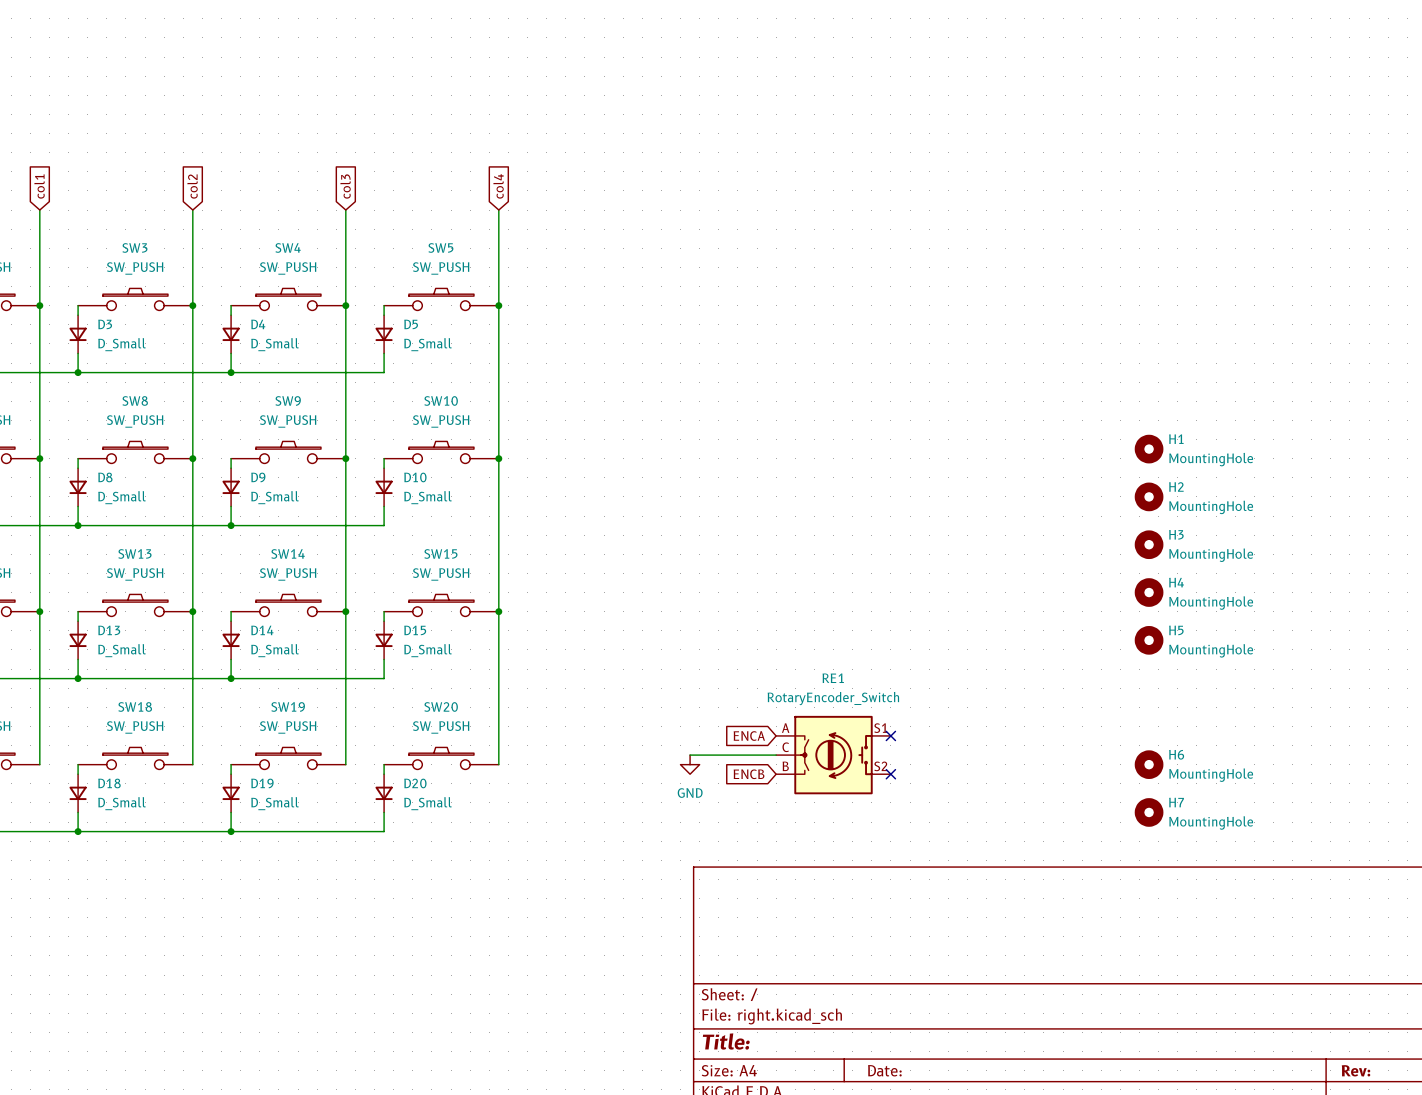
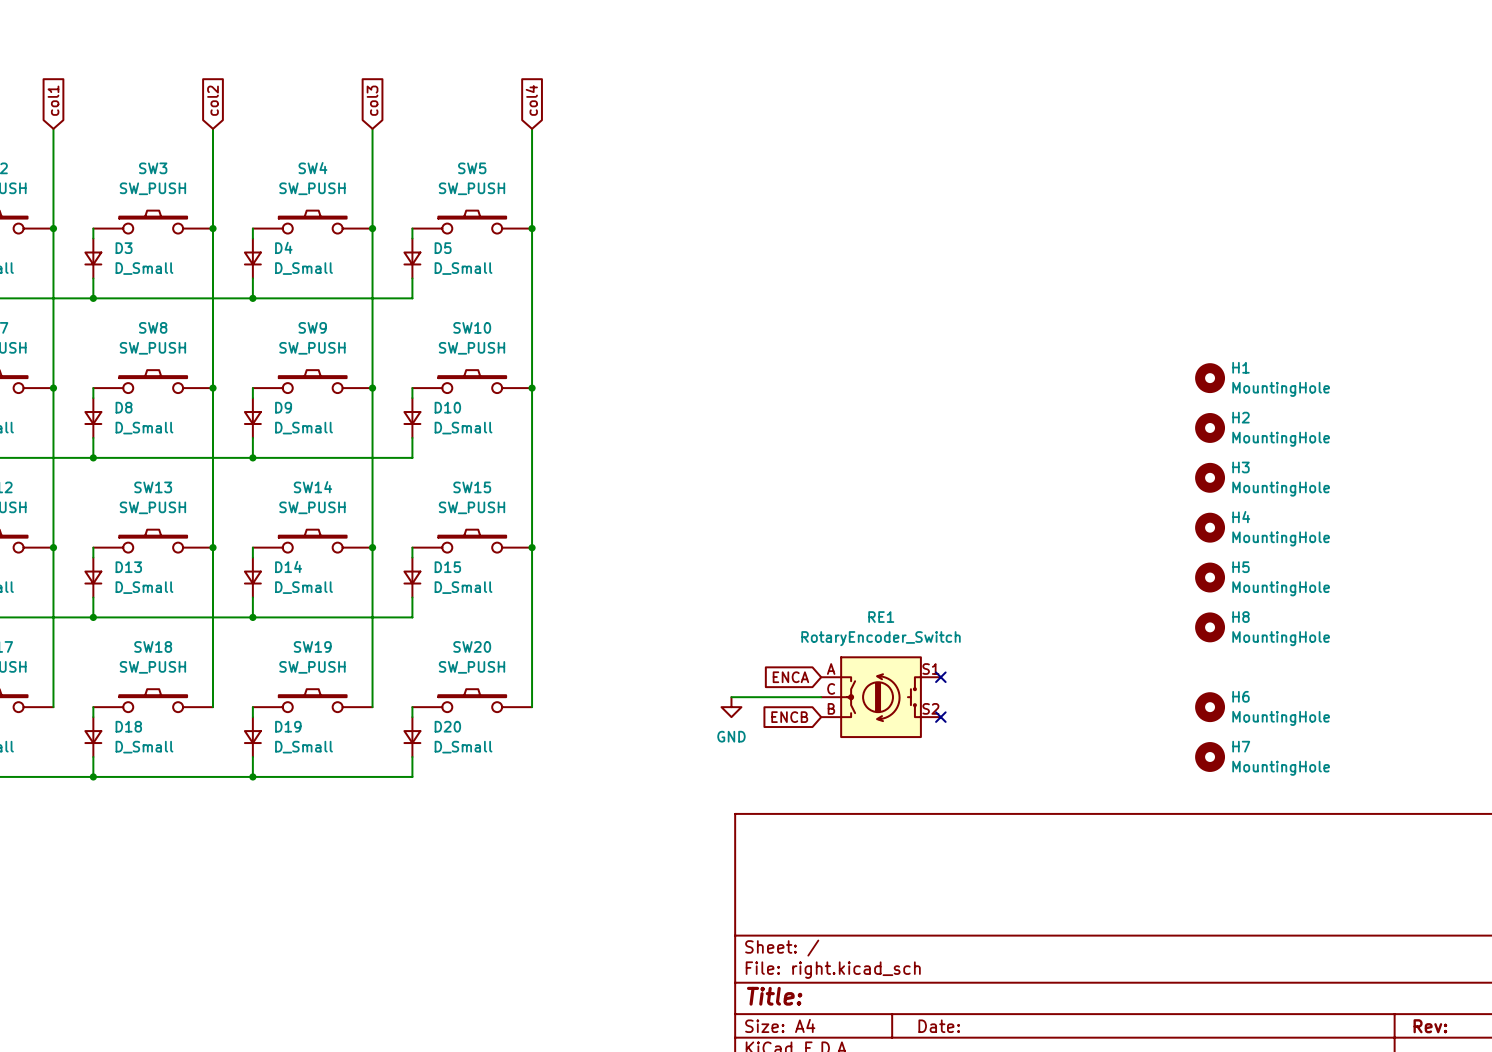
H8: none -> MountingHole (1210, 627)

